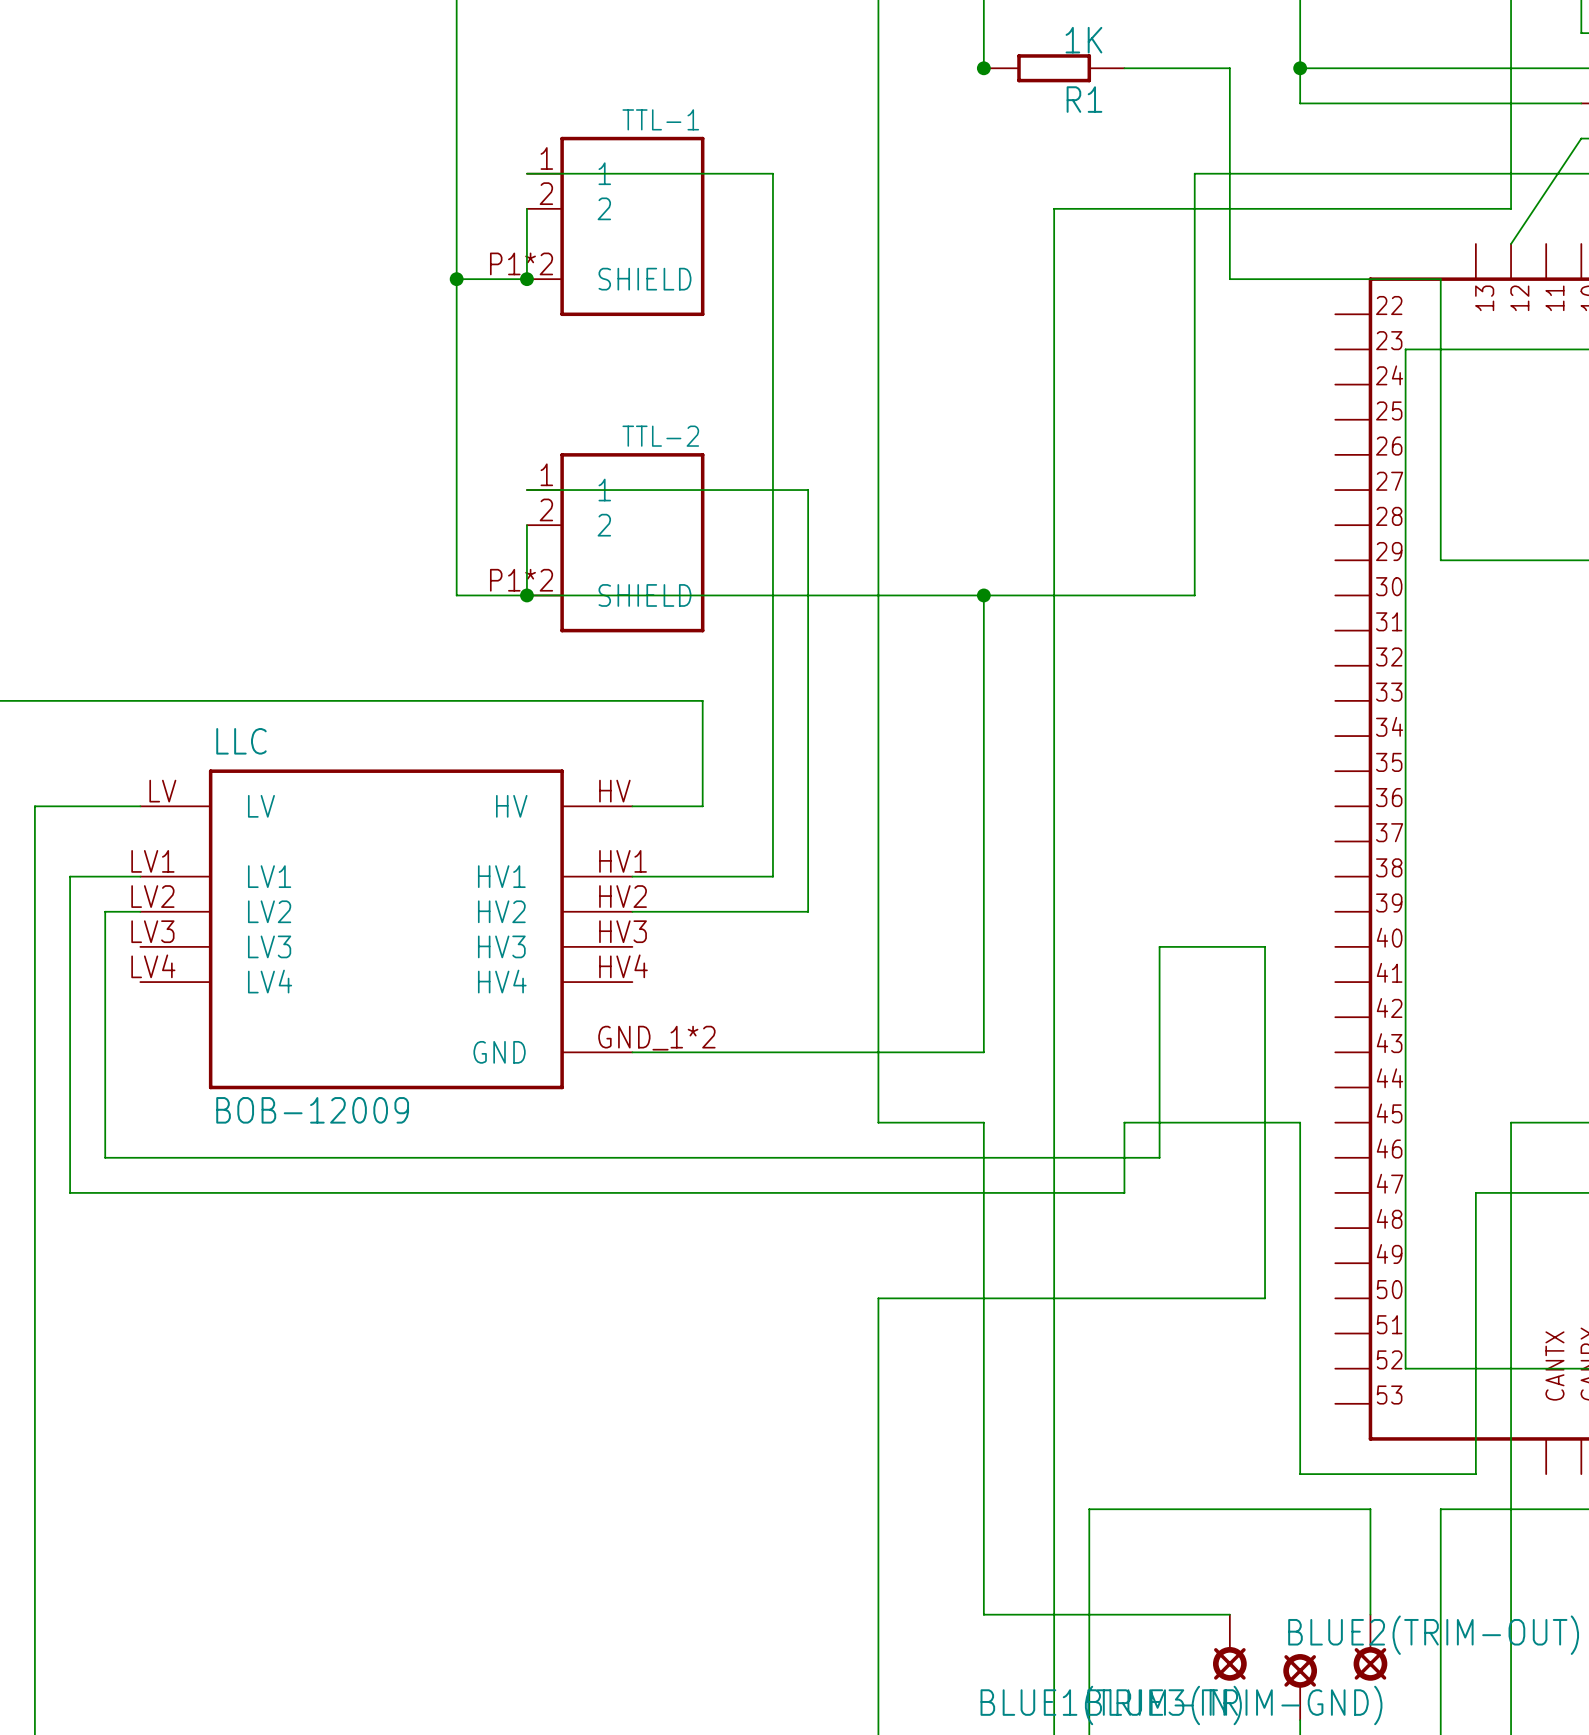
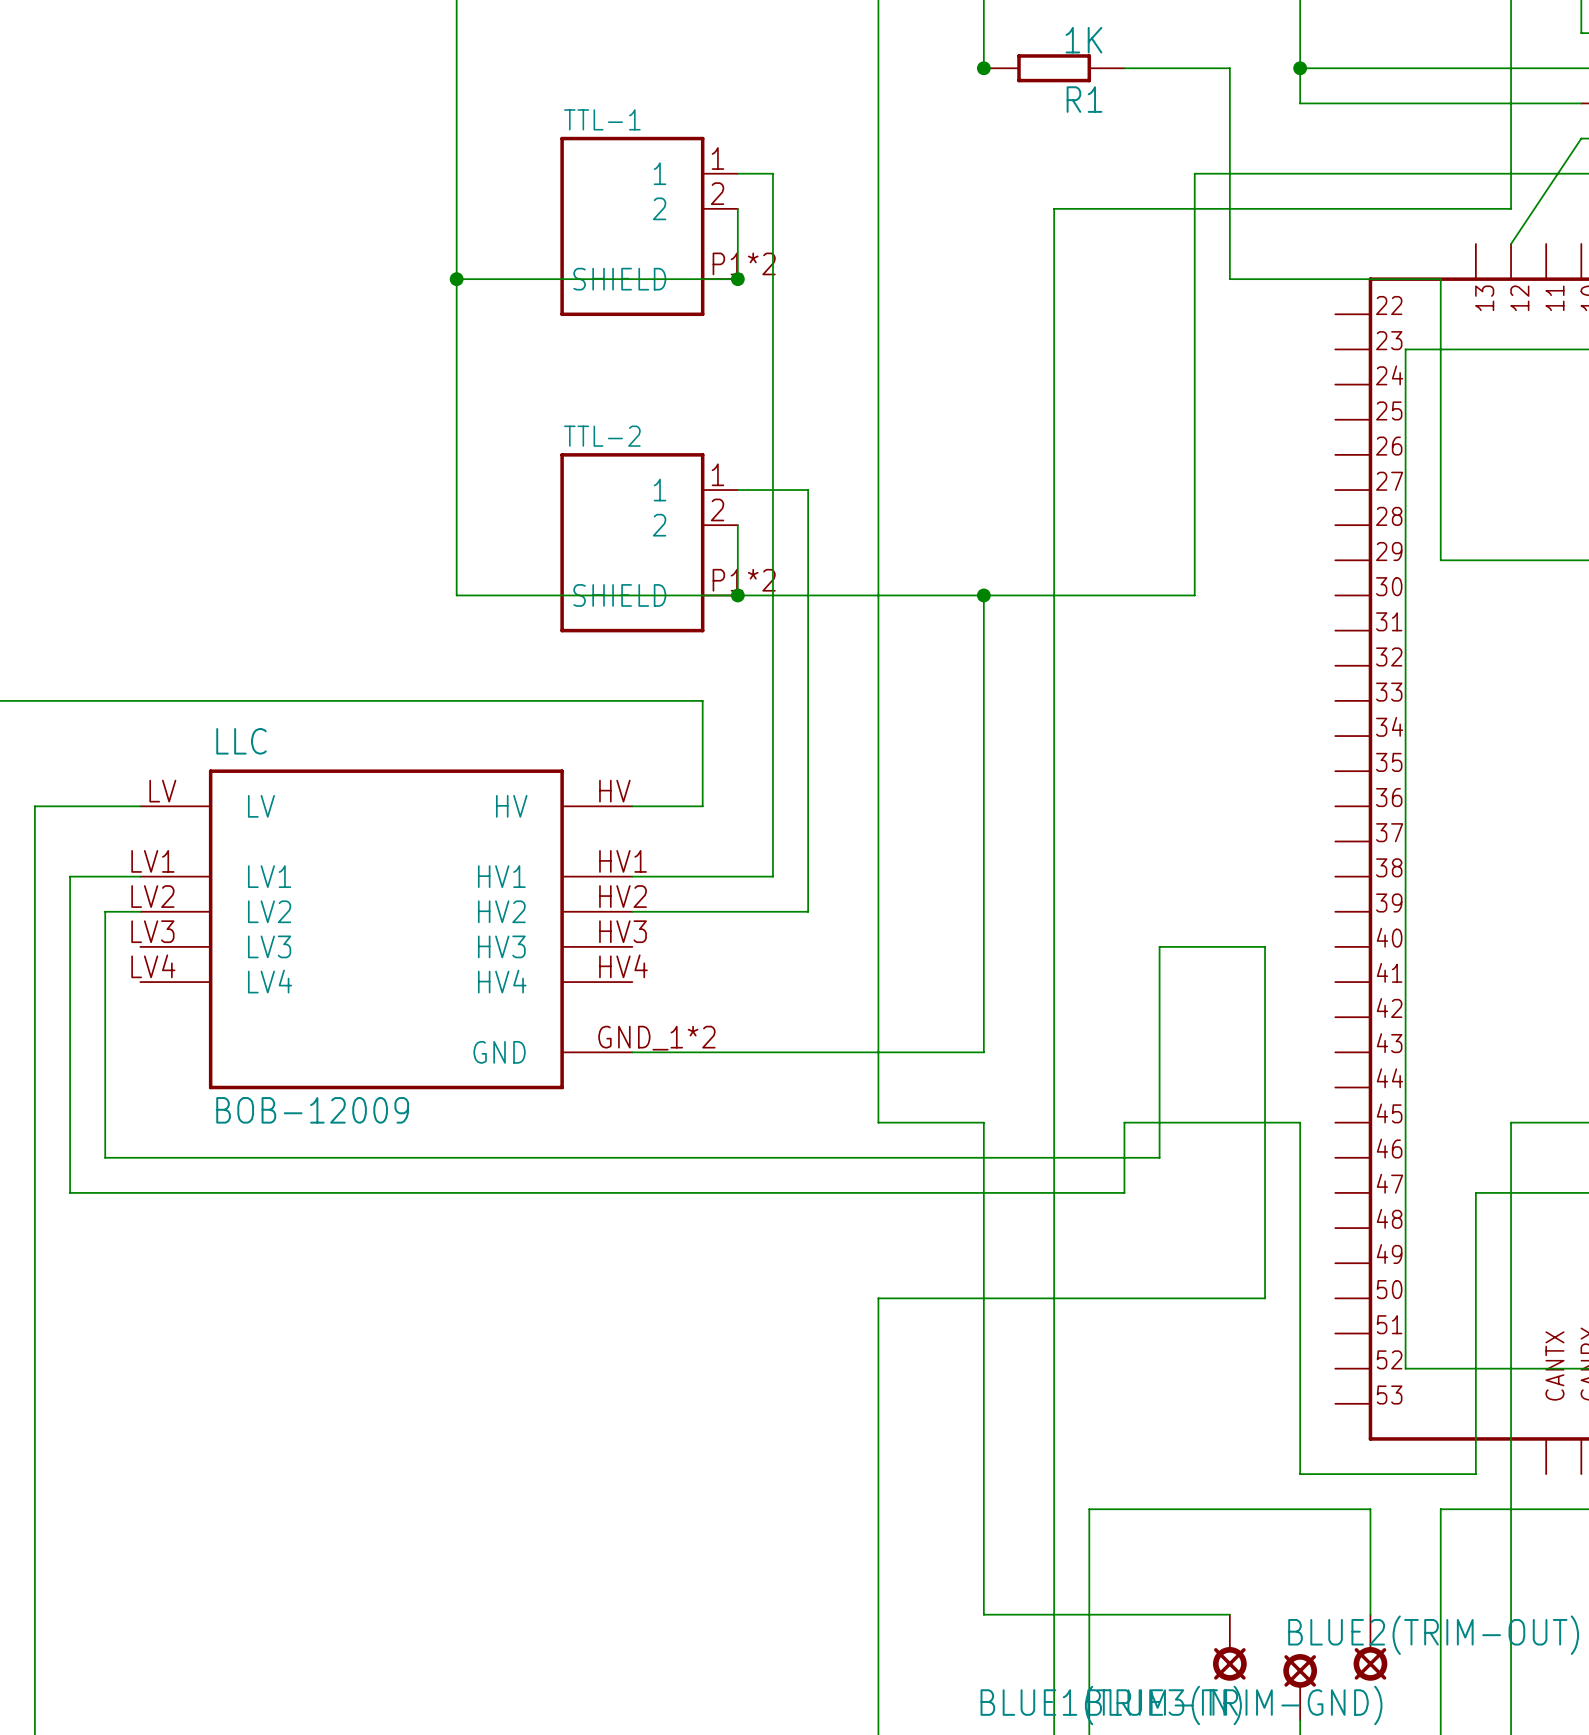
wire: (526, 173) (737, 173) -> none
wire: (526, 208) (526, 279) -> (737, 208) (737, 279) (526, 279)
TTL-1 flip: as is (632, 226) -> left-right (632, 226)
junction: (526, 279) -> none
junction: none -> (737, 279)
wire: (526, 490) (737, 490) -> none
wire: (526, 525) (526, 595) -> (737, 525) (737, 595)
TTL-2 flip: as is (632, 542) -> left-right (632, 542)
junction: (526, 595) -> none
junction: none -> (737, 595)

